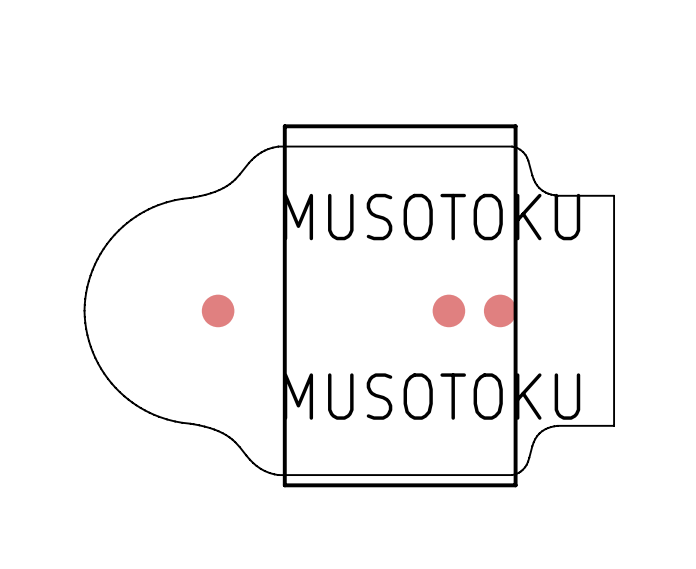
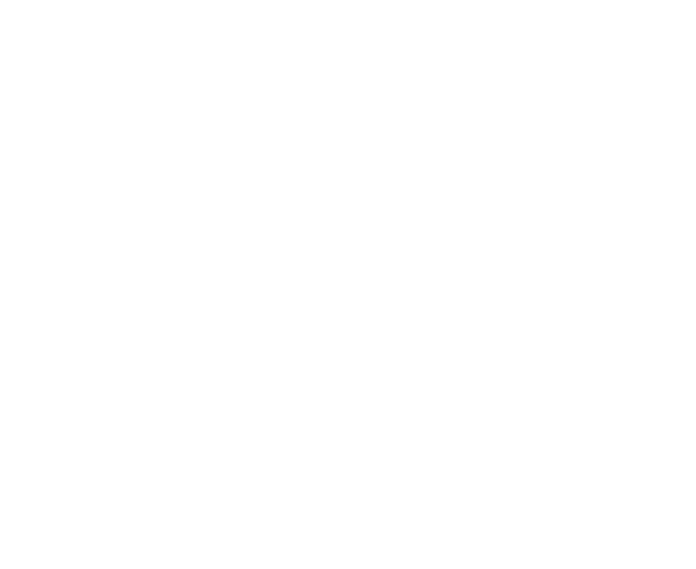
line: (284, 126) (284, 485) (515, 485) (515, 126) (284, 126) -> none
board edge: (278, 146) (512, 146) (520, 149) (525, 154) (535, 182) (545, 192) (557, 195) (614, 195) (614, 425) (557, 425) (545, 429) (535, 439) (525, 467) (518, 472) (512, 475) (278, 475) (264, 471) (256, 465) (235, 442) (222, 433) (204, 426) (158, 416) (140, 407) (124, 396) (100, 368) (92, 352) (86, 328) (84, 310) (86, 293) (92, 270) (100, 253) (118, 230) (139, 214) (166, 202) (200, 196) (219, 190) (235, 179) (257, 154) (278, 146) -> none
text: MUSOTOKU (432, 217) -> none
part: (218, 310) -> none
part: (448, 310) -> none
part: (500, 310) -> none
text: MUSOTOKU (432, 396) -> none

